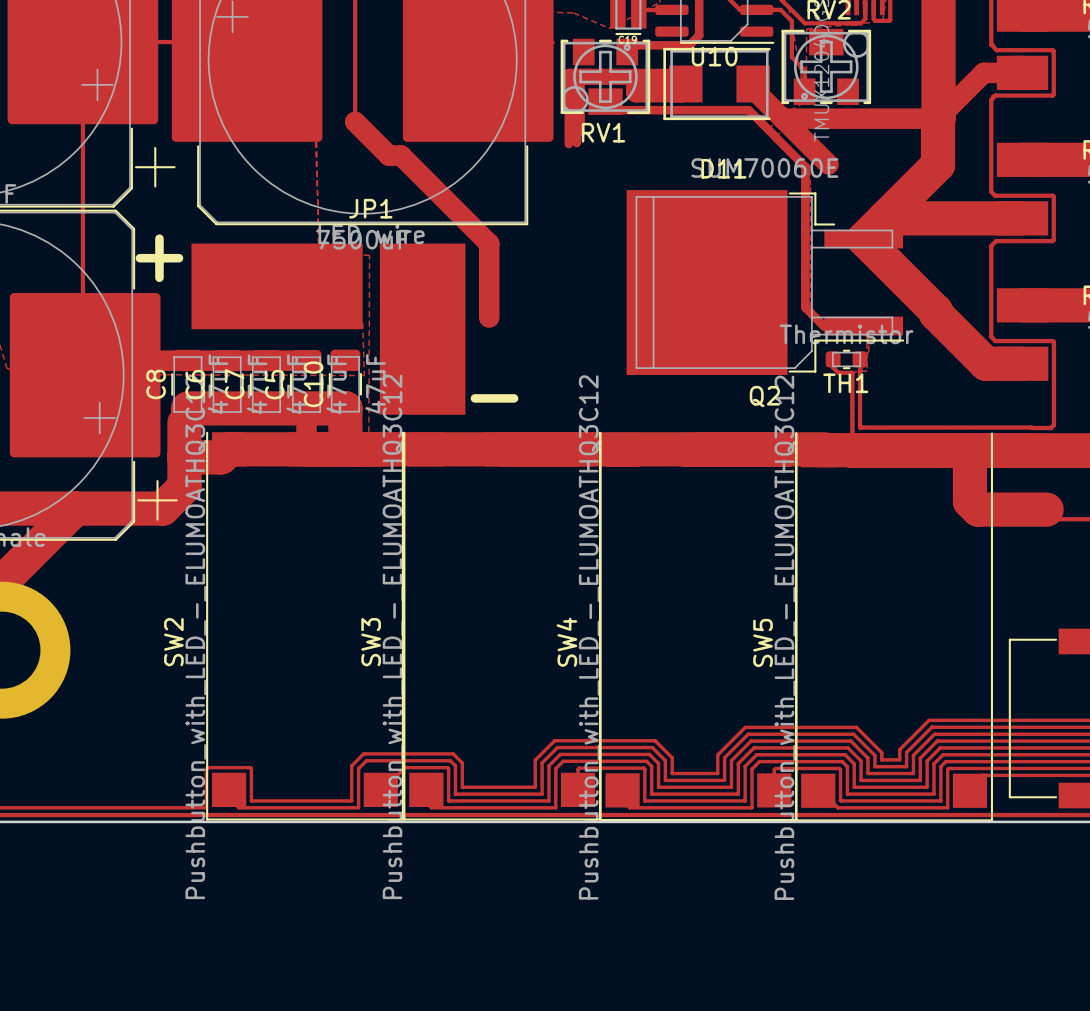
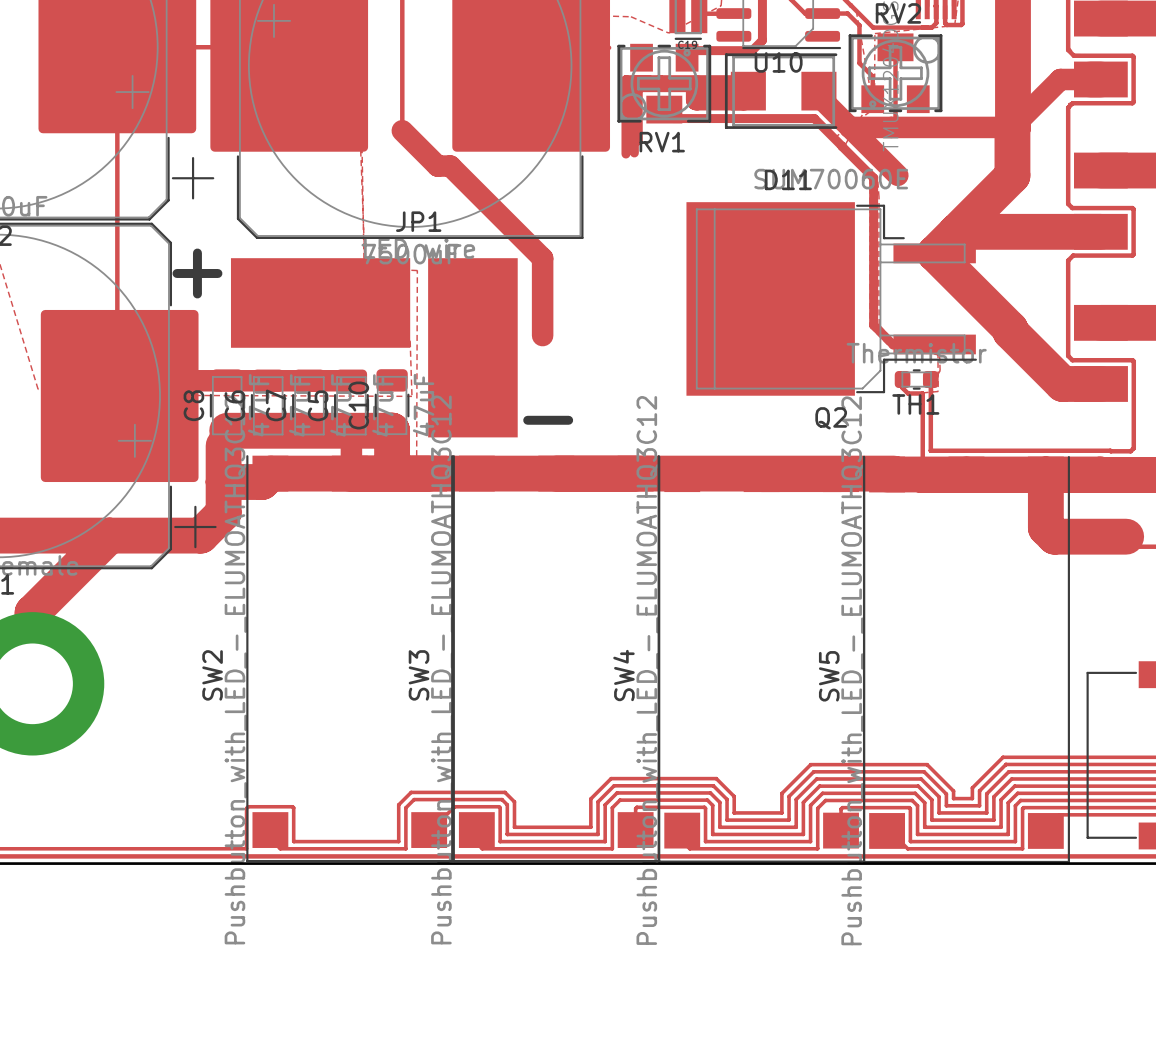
track: none -> (895, 47) (895, 123) (891, 127)

